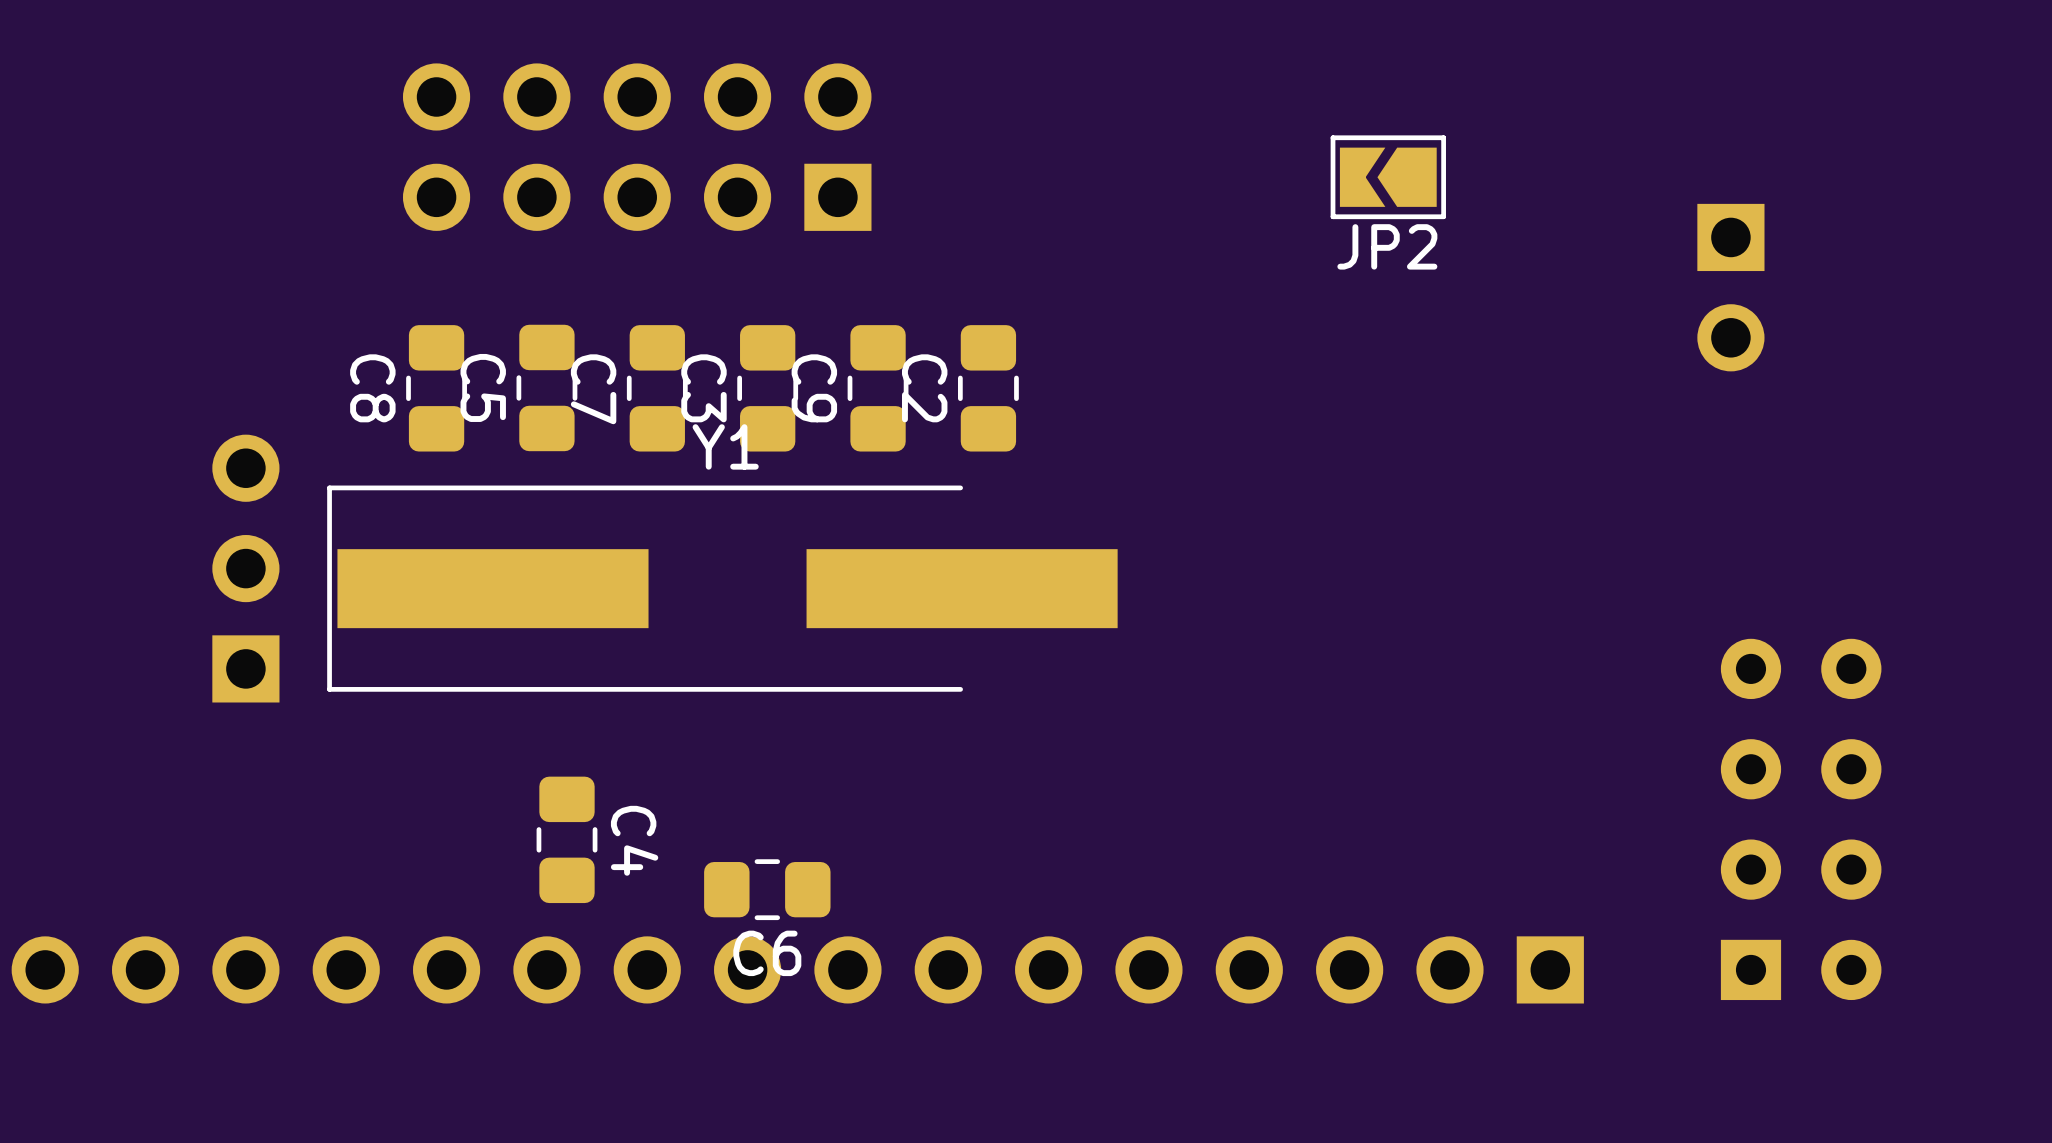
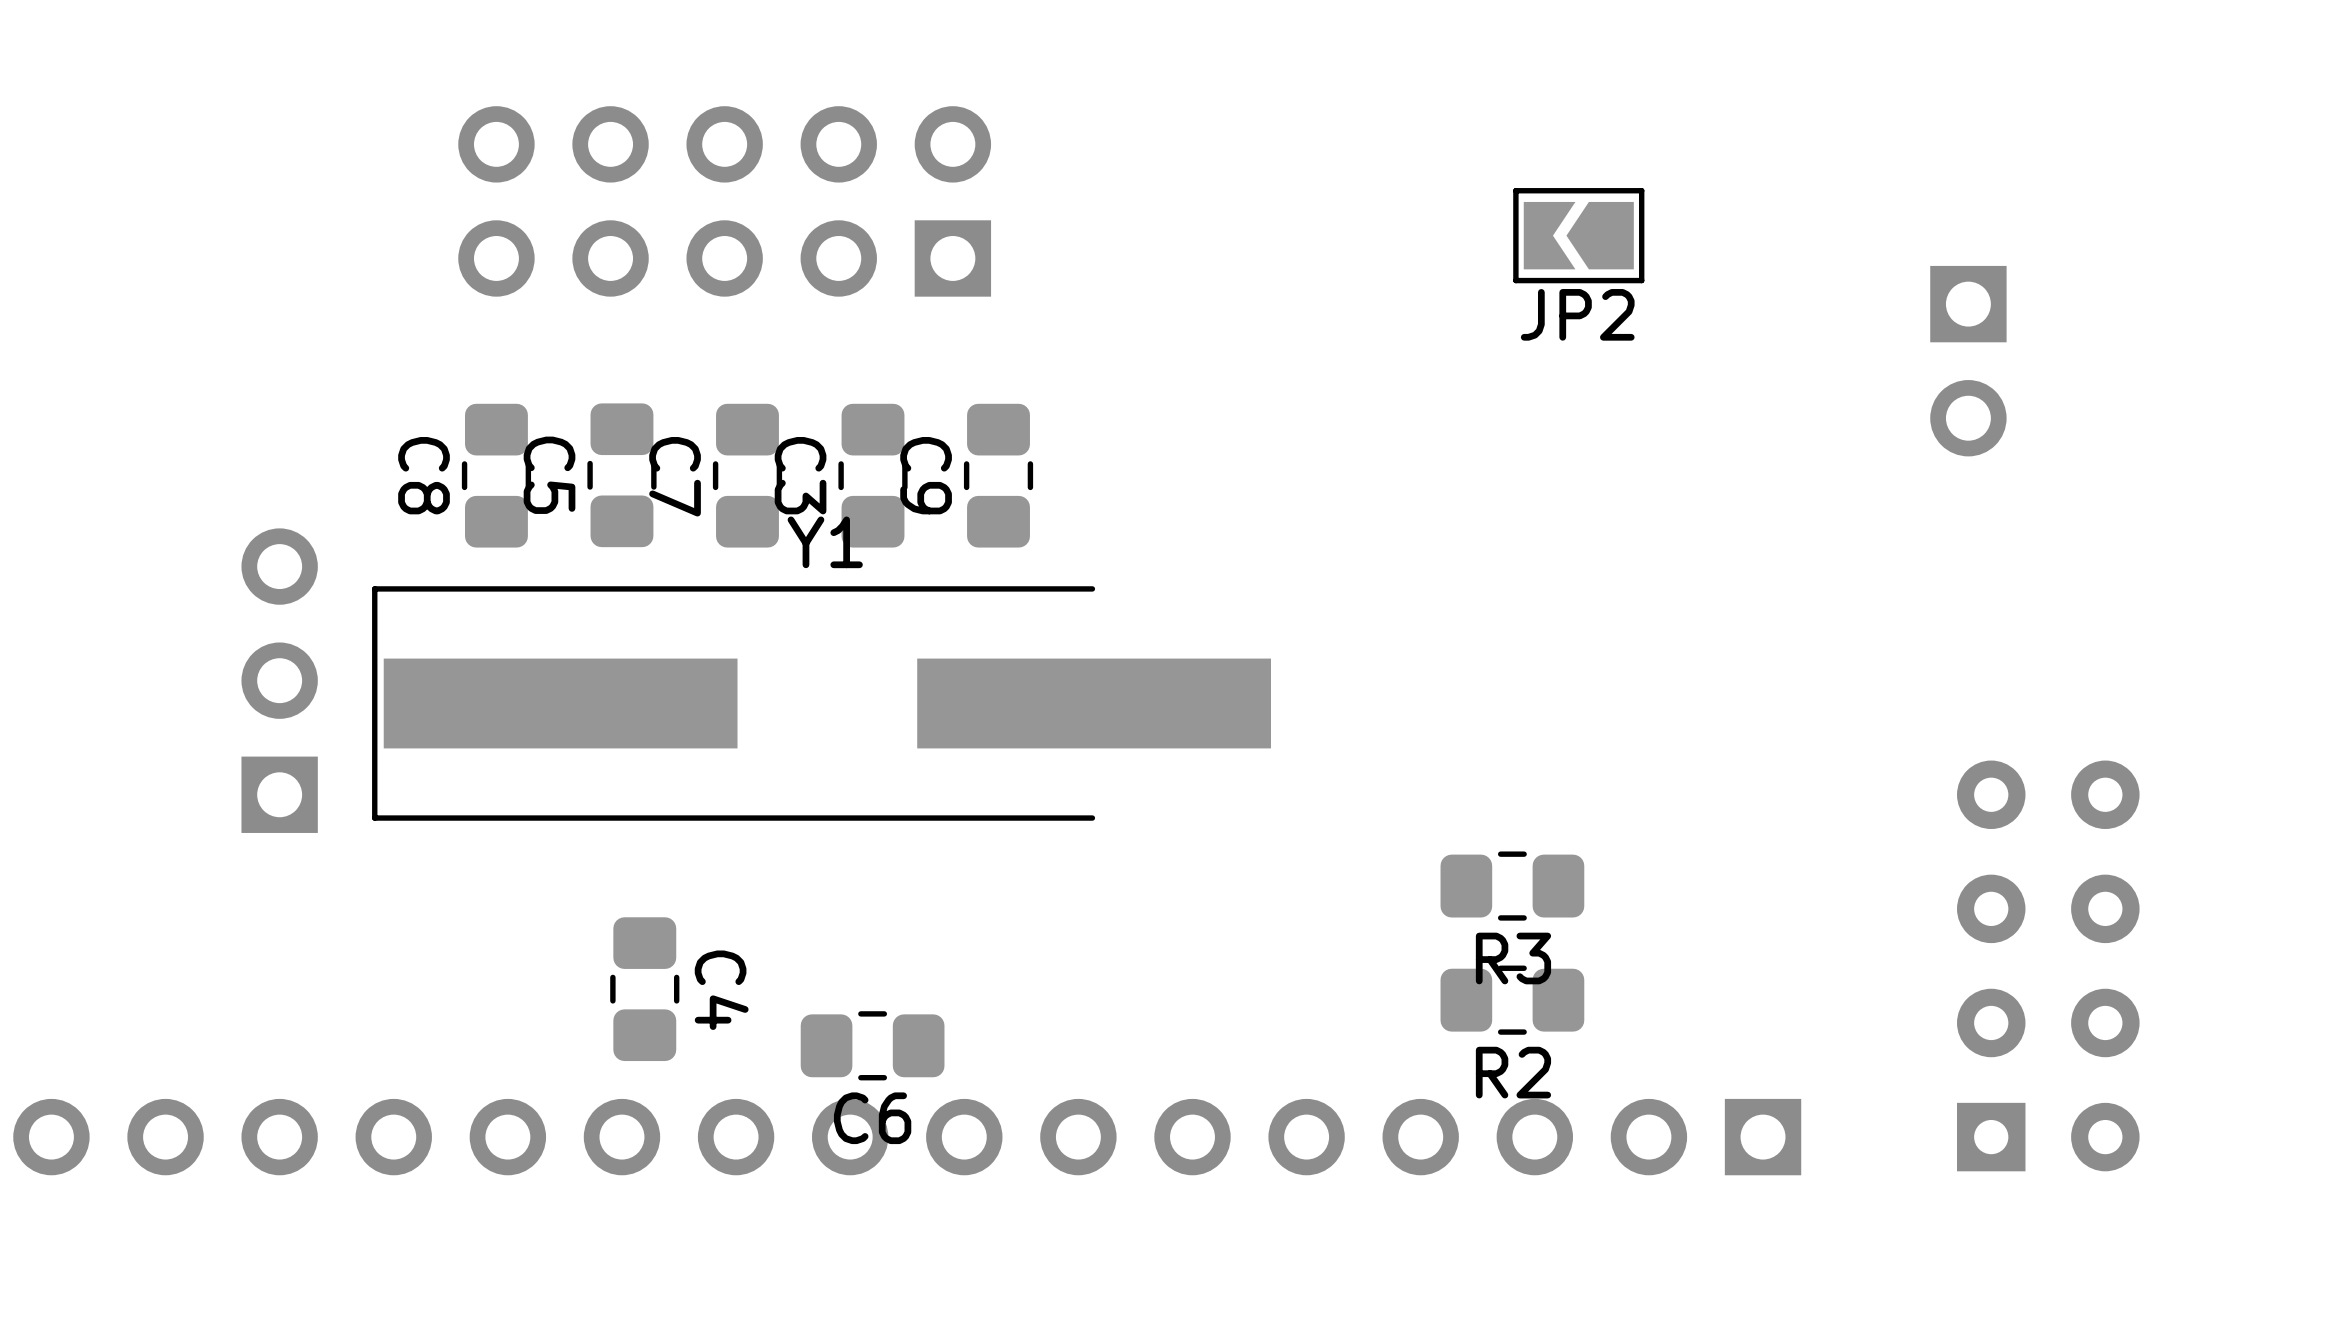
C2: (988, 388) -> none
R3: none -> (1512, 886)
R2: none -> (1512, 1000)

